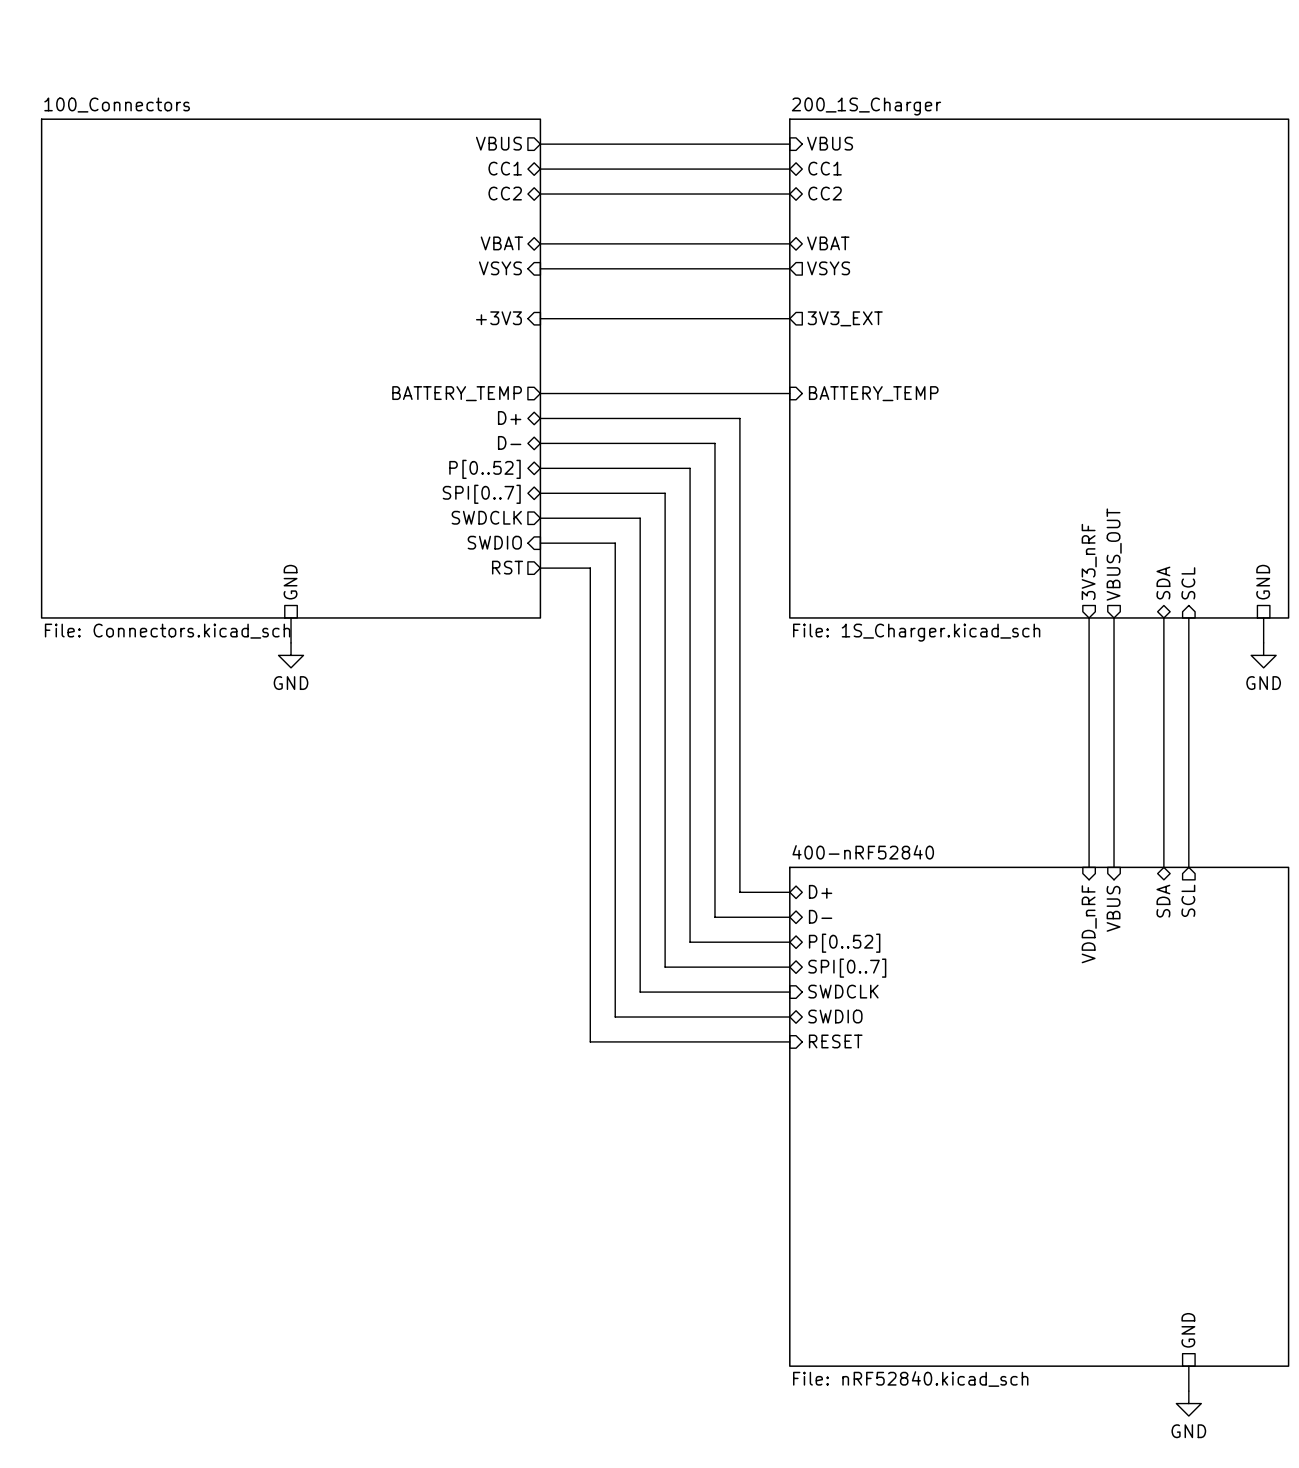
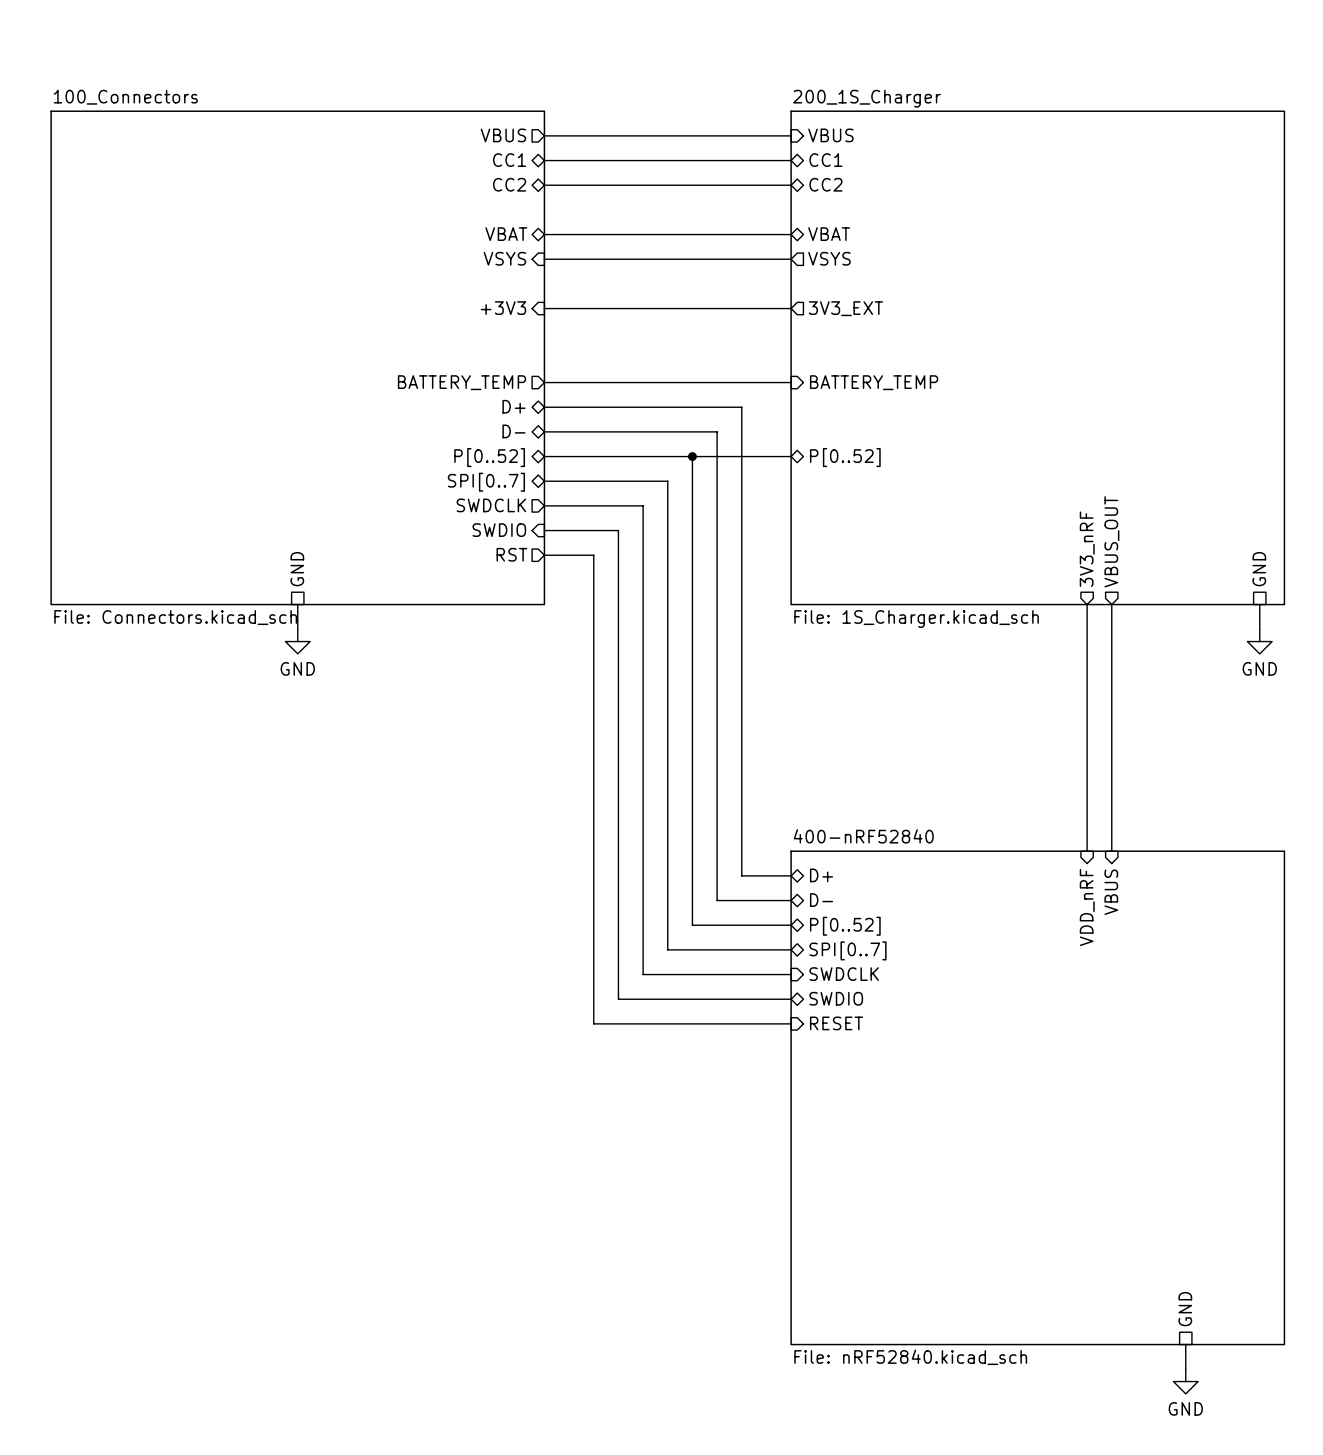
bus: none -> (692, 456) (791, 456)
junction: none -> (692, 456)
sheet pin: none -> P[0..52] (845, 457)
sheet pin: SDA (1163, 583) -> none
sheet pin: SCL (1188, 583) -> none
wire: (1163, 617) (1163, 867) -> none
wire: (1188, 617) (1188, 867) -> none
sheet pin: SCL (1188, 900) -> none
sheet pin: SDA (1163, 901) -> none

